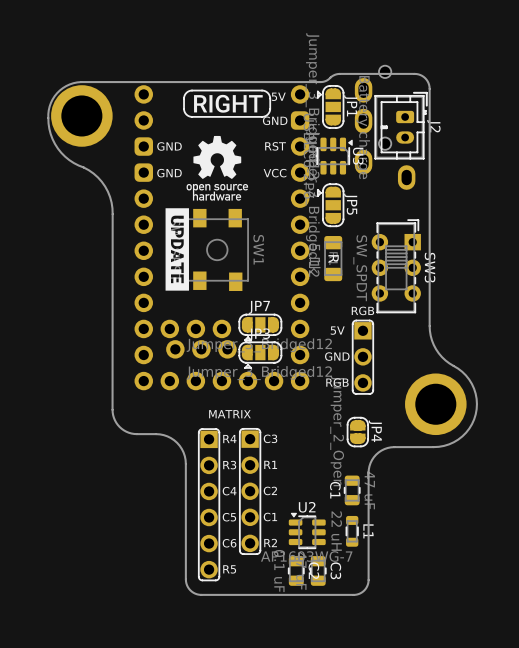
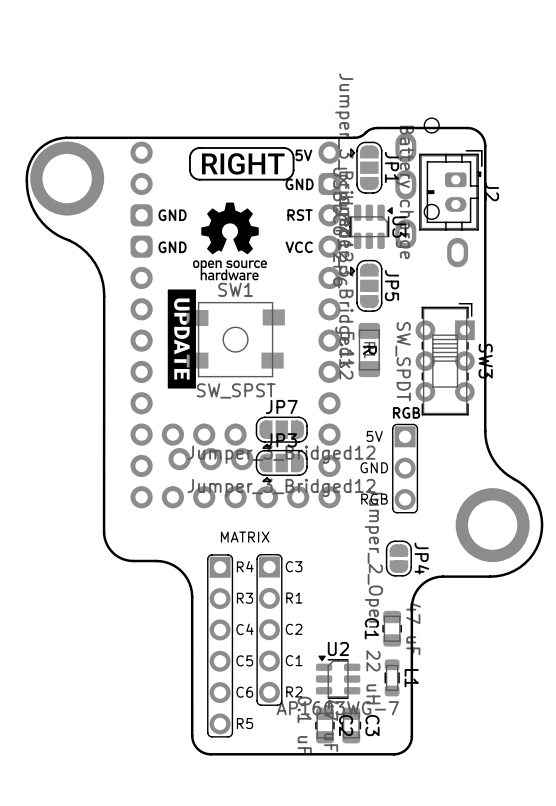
SW1 rotation: 0° (217, 249) -> 90° counterclockwise (235, 339)

